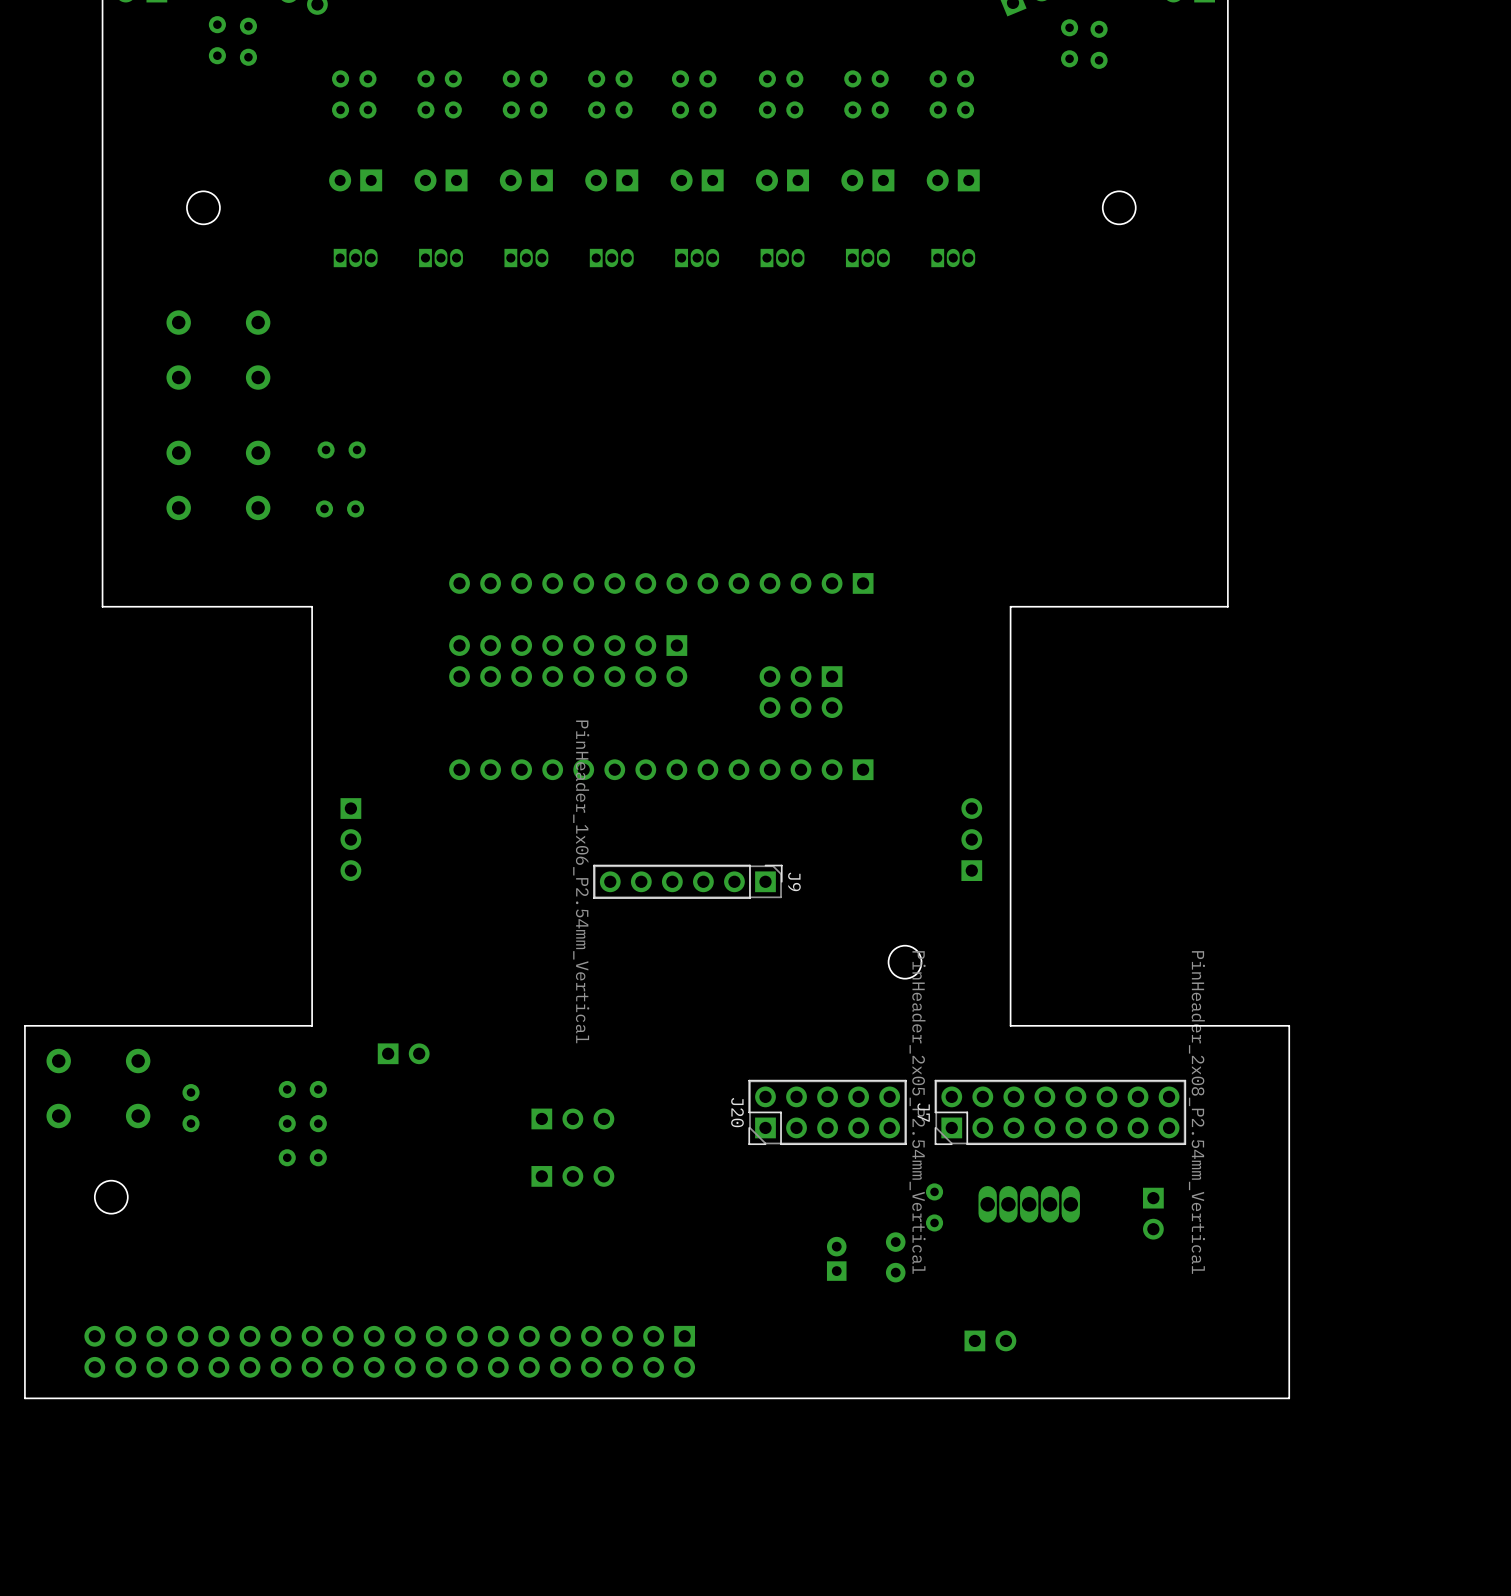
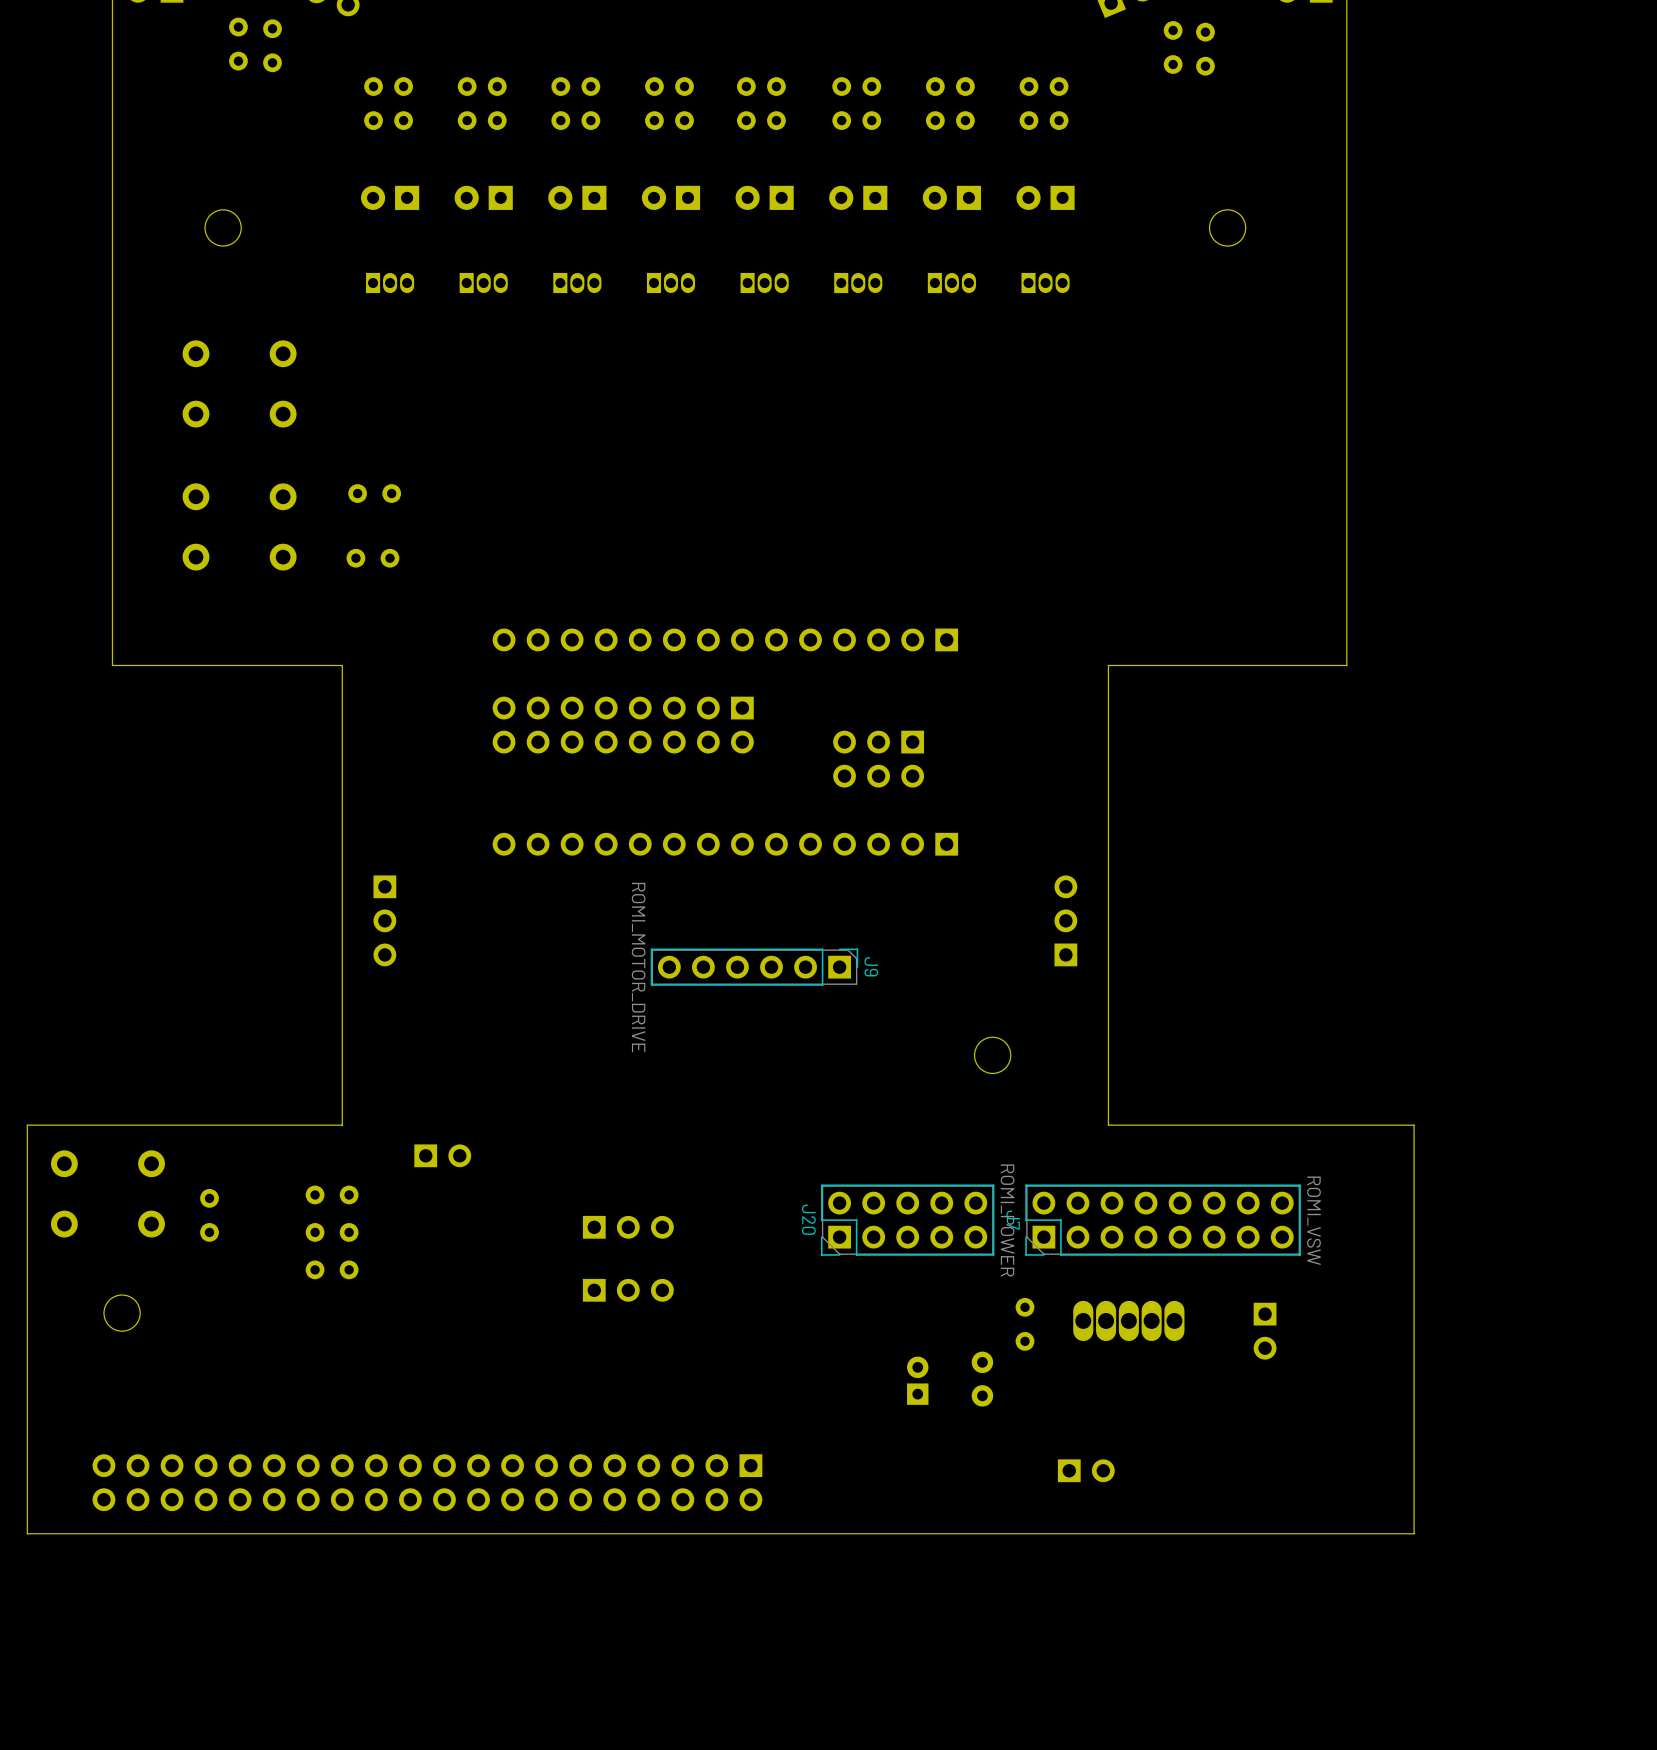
J9 value: PinHeader_1x06_P2.54mm_Vertical (581, 881) -> ROMI_MOTOR_DRIVE (638, 967)
J20 value: PinHeader_2x05_P2.54mm_Vertical (917, 1112) -> ROMI_POWER (1007, 1220)
J7 value: PinHeader_2x08_P2.54mm_Vertical (1196, 1112) -> ROMI_VSW (1313, 1220)

